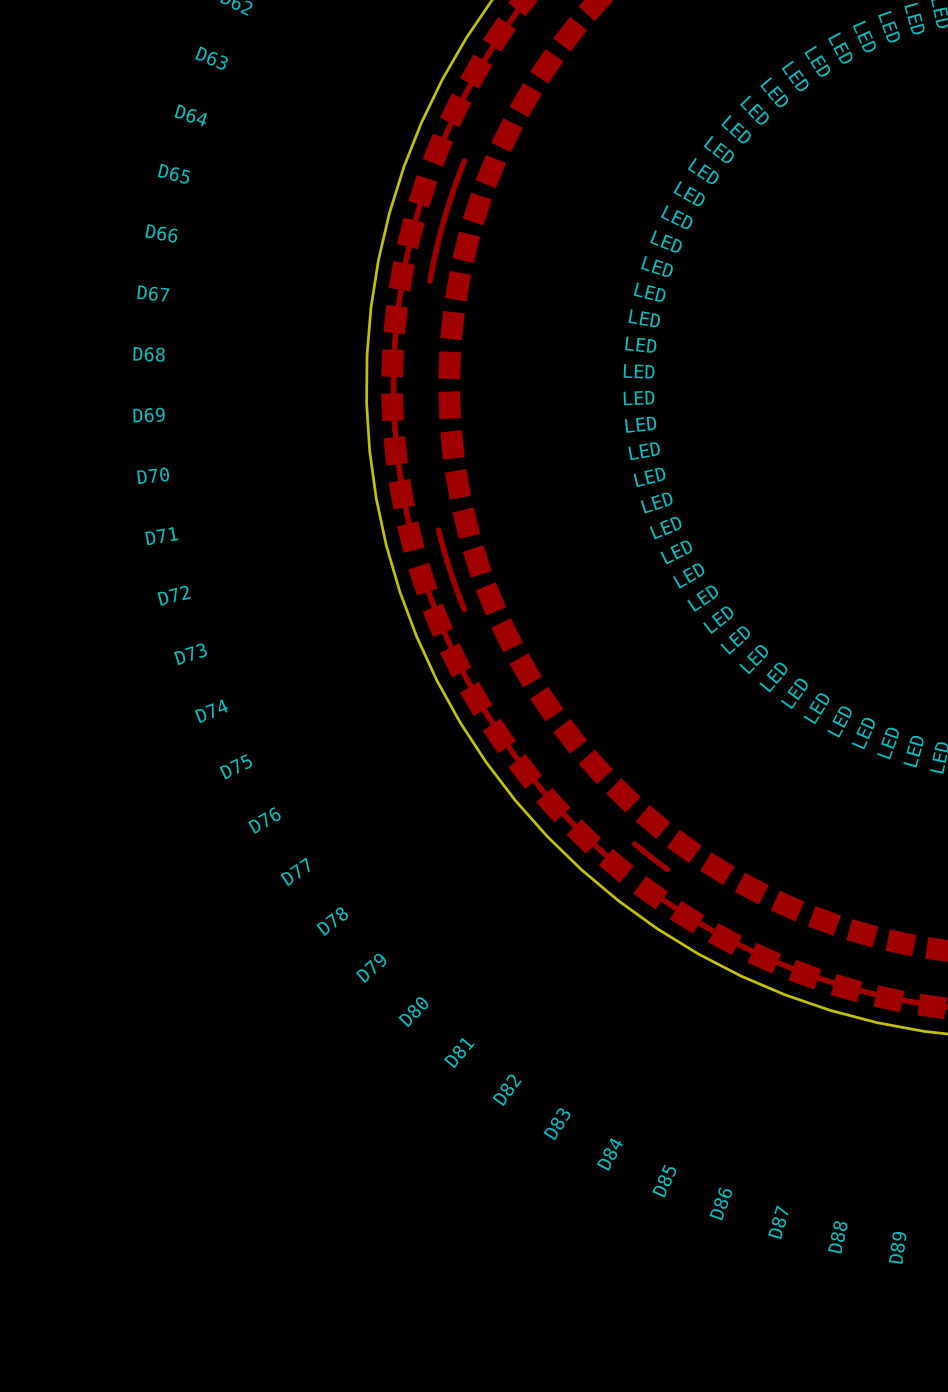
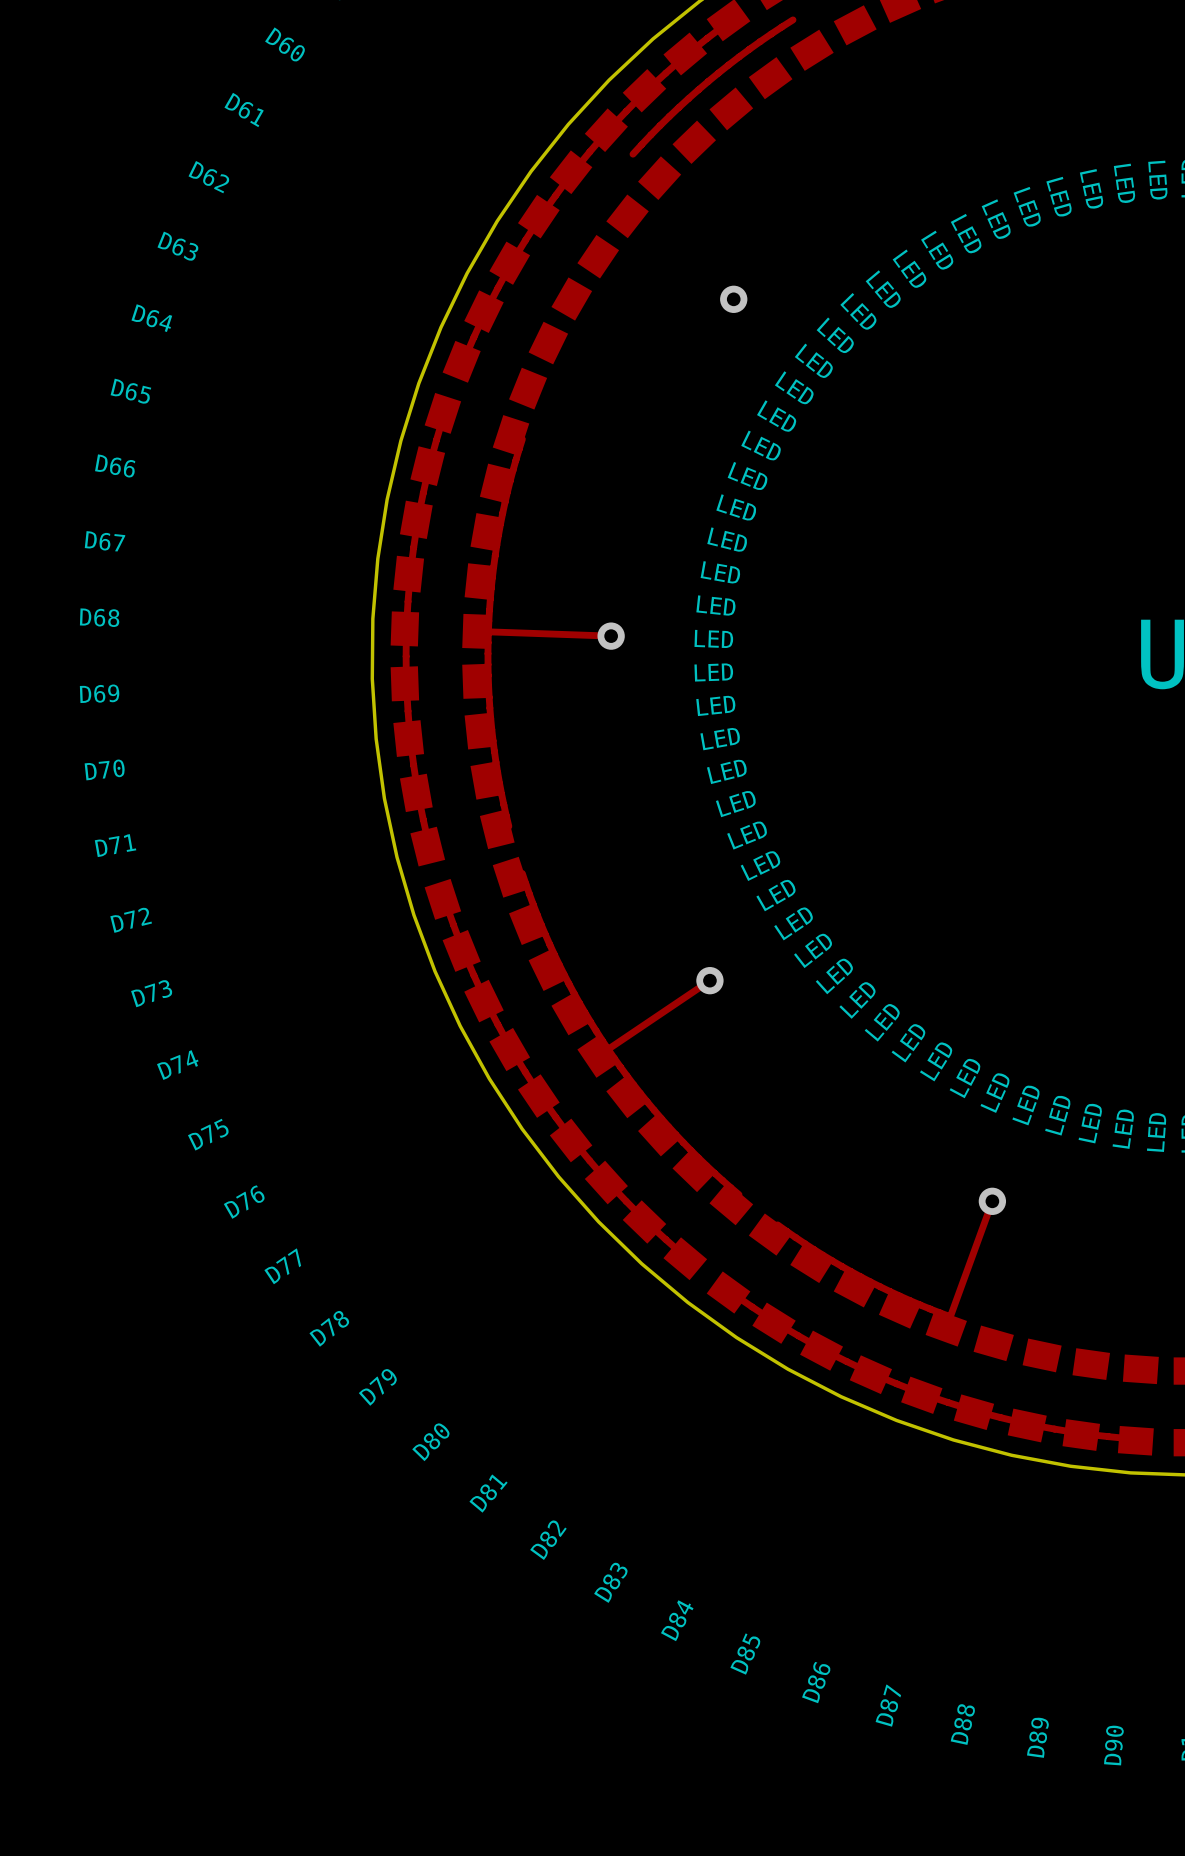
via: none -> (733, 299)
track: (464, 160) (443, 220) (429, 281) -> none
track: none -> (522, 439) (507, 491) (498, 534) (492, 577) (488, 631)
track: none -> (488, 631) (611, 636)
track: none -> (488, 631) (488, 675) (491, 729) (497, 773) (508, 826)
via: none -> (611, 636)
track: (438, 530) (464, 609) -> none
track: none -> (522, 873) (541, 924) (559, 964) (579, 1003) (608, 1049)
track: none -> (709, 980) (608, 1049)
via: none -> (709, 980)
track: none -> (608, 1049) (633, 1084) (668, 1126) (706, 1165) (739, 1194)
track: none -> (992, 1201) (950, 1316) (909, 1300) (860, 1276) (813, 1249) (777, 1224)
via: none -> (992, 1201)
track: (634, 843) (667, 869) -> none

